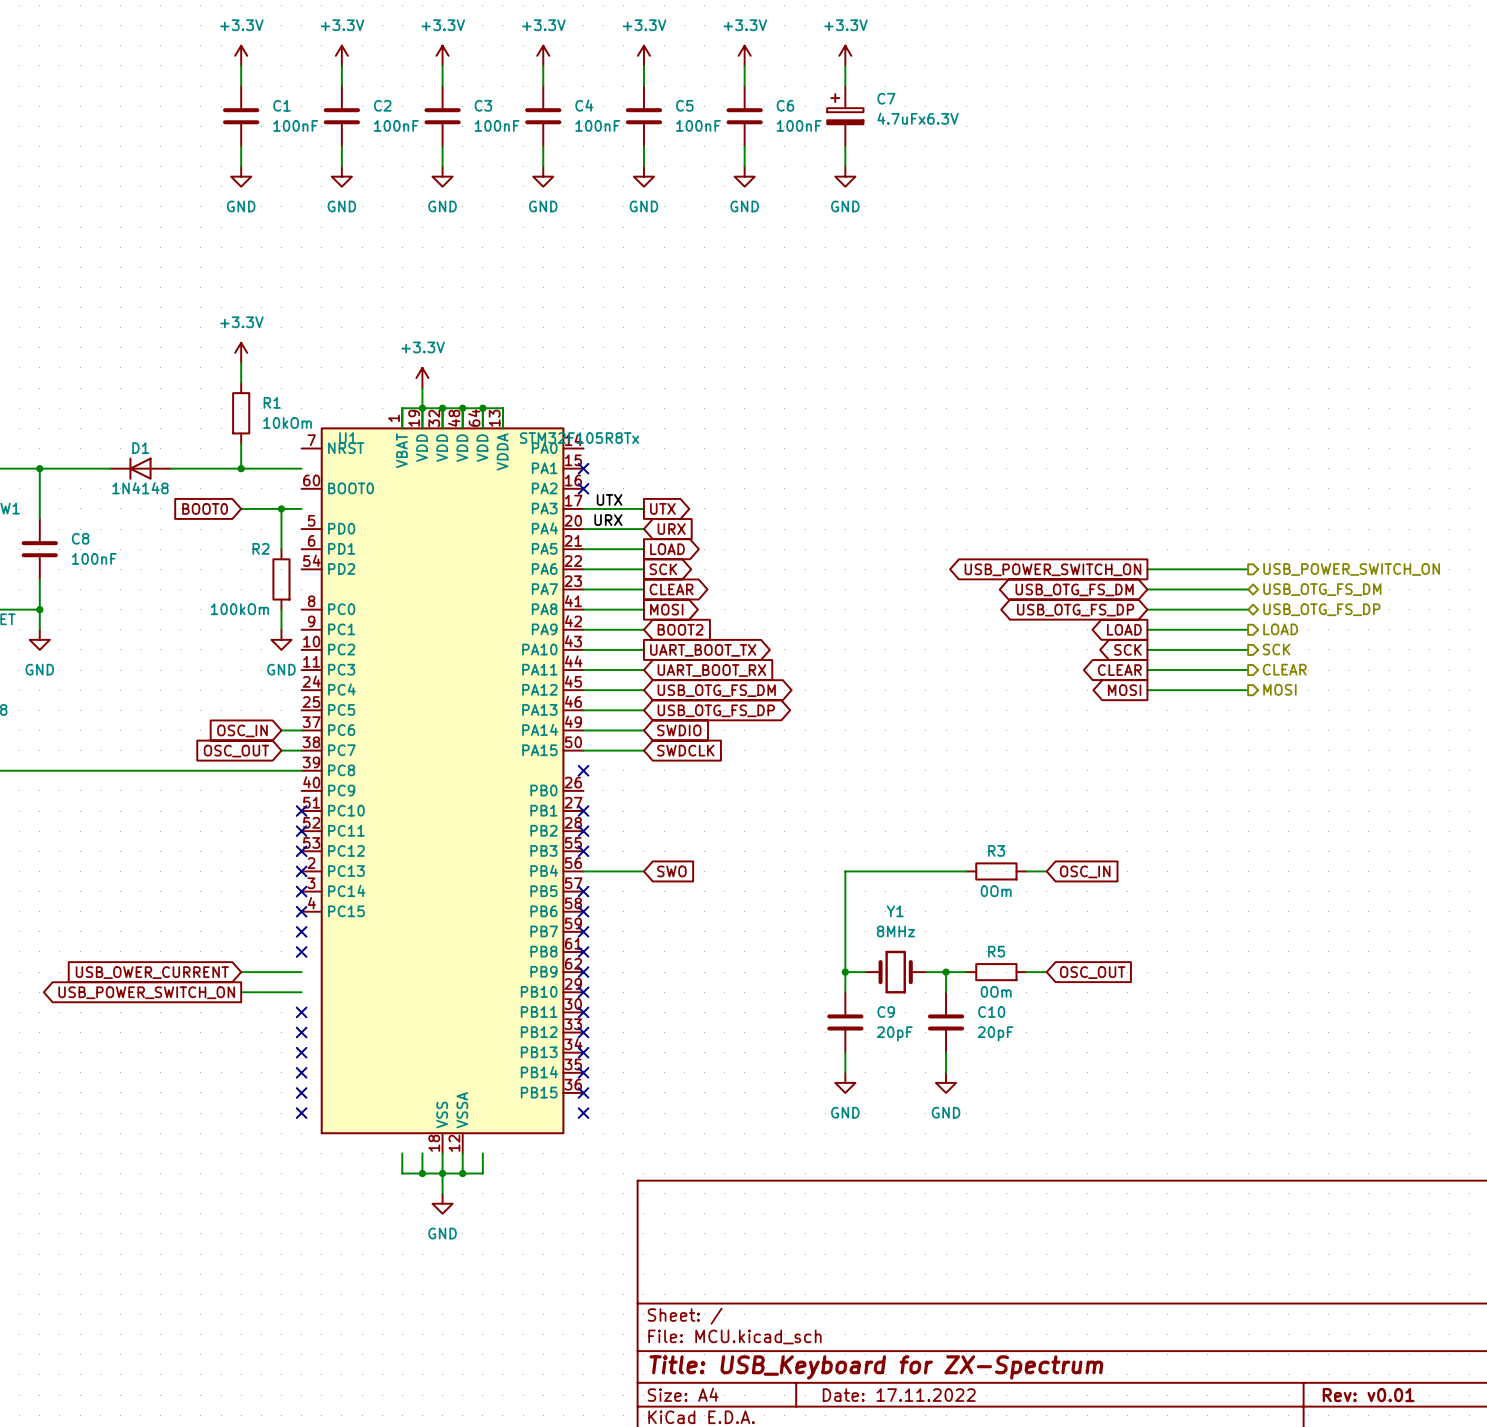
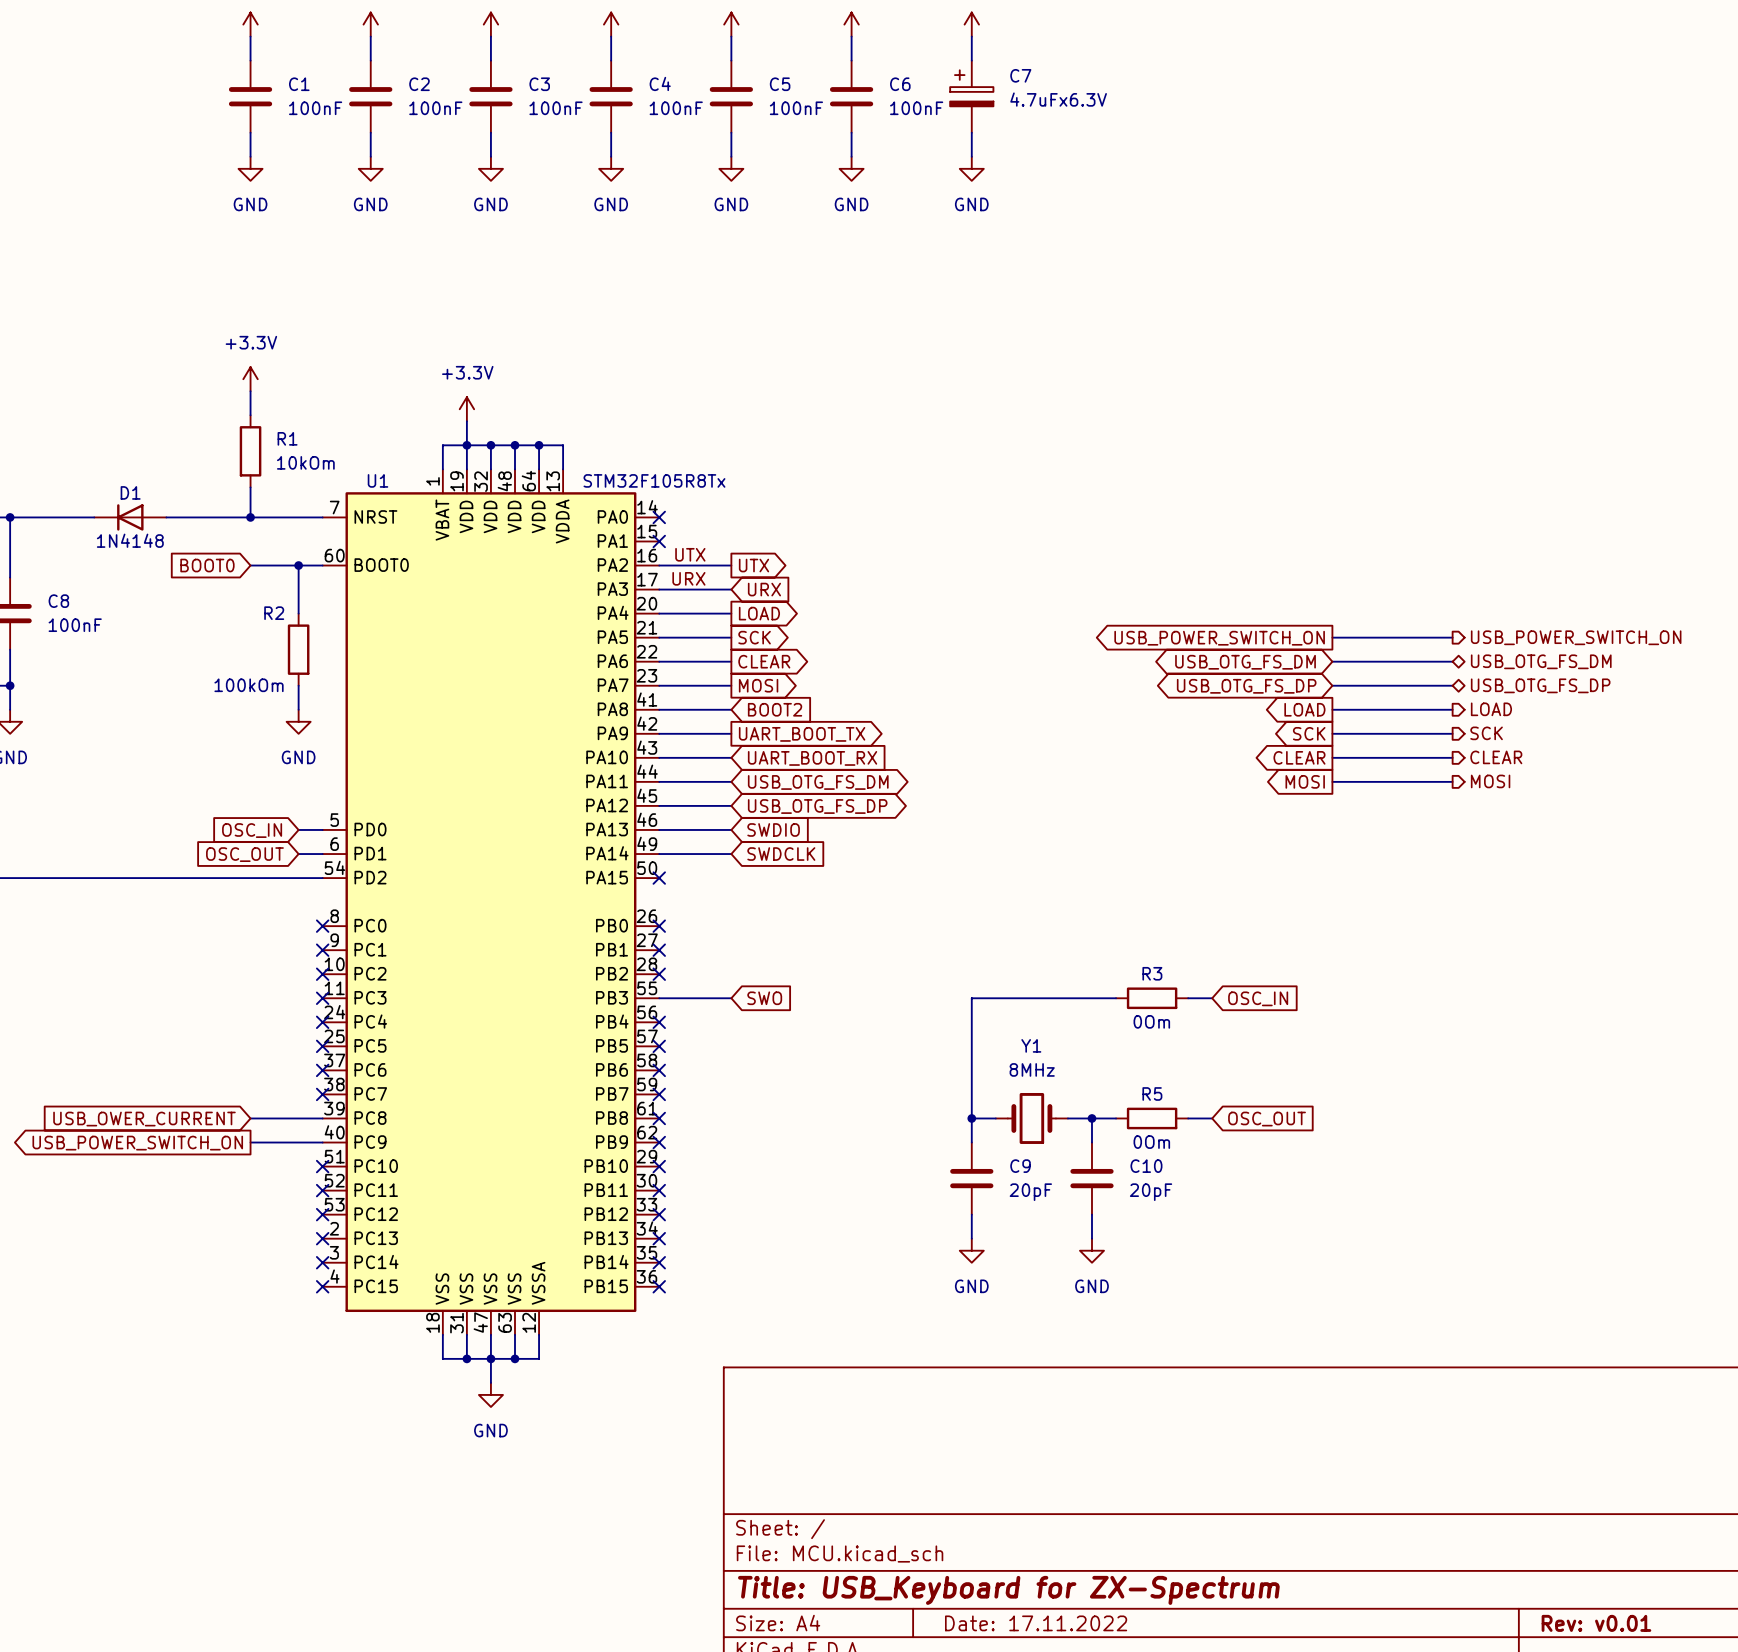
U1 symbol: [301, 408, 584, 1154] -> [322, 469, 660, 1335]

